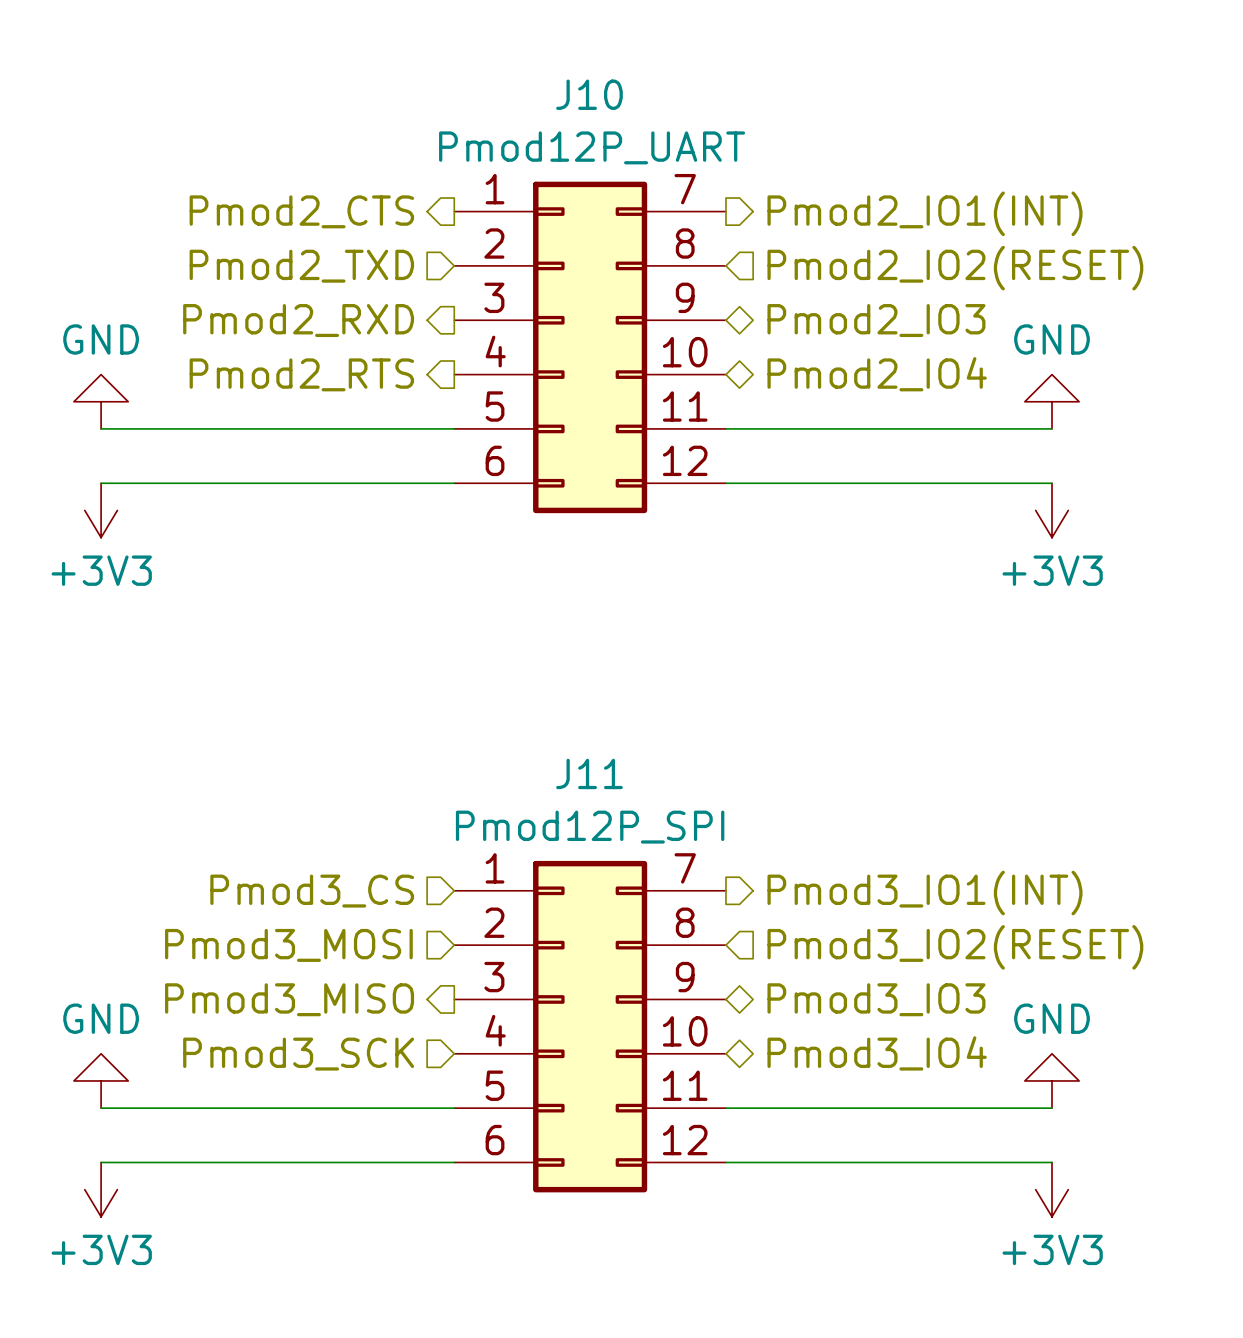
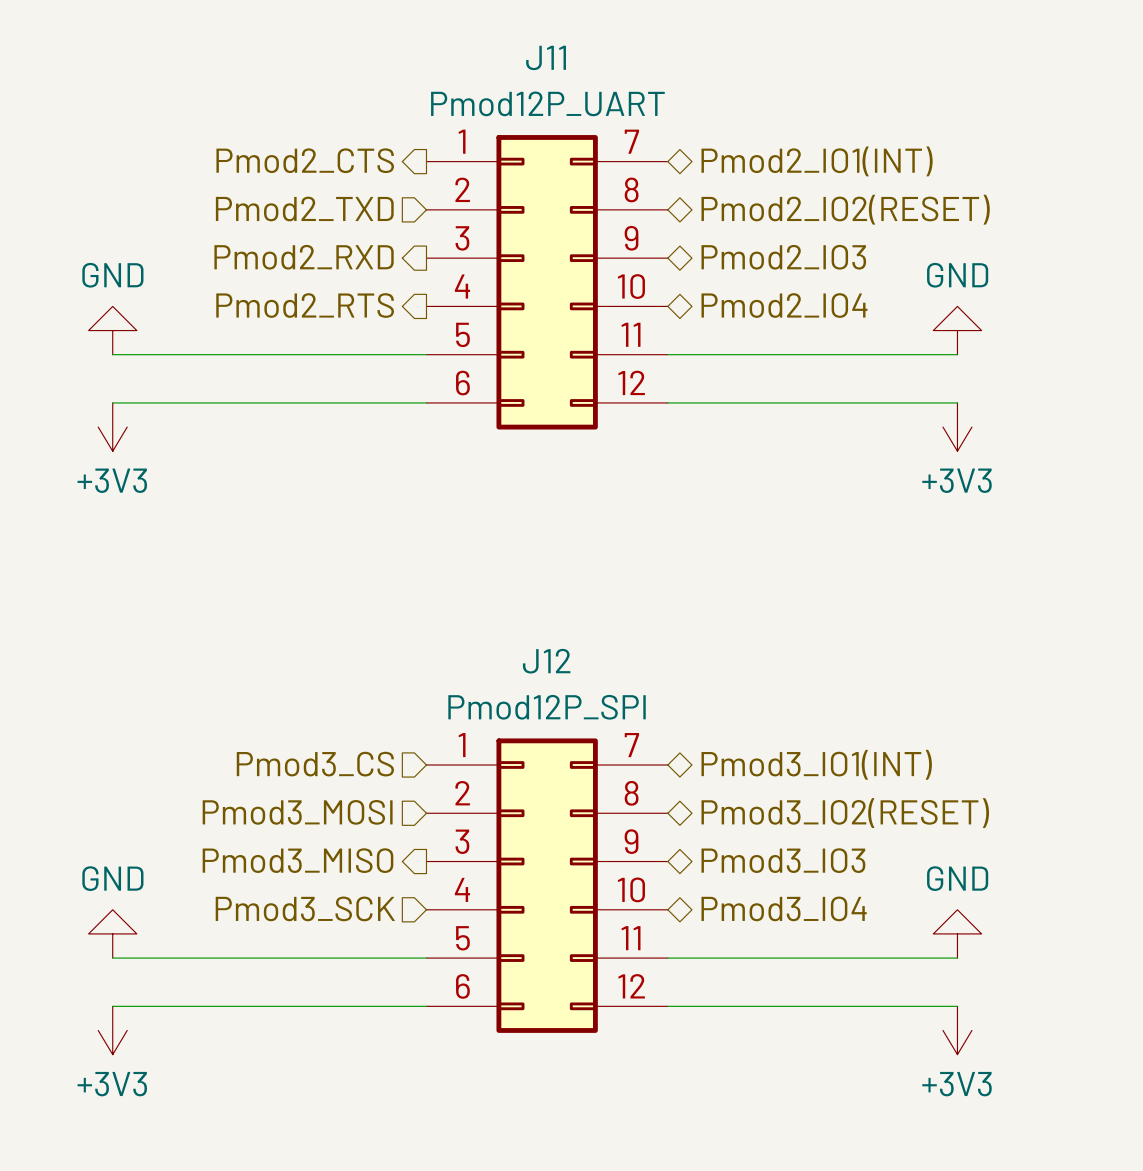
J10 name: J10 (589, 94) -> J11 (546, 57)
hierarchical label shape: output (924, 213) -> bidirectional (817, 161)
hierarchical label shape: input (955, 268) -> bidirectional (845, 209)
J11 name: J11 (589, 773) -> J12 (546, 661)
hierarchical label shape: output (924, 893) -> bidirectional (816, 764)
hierarchical label shape: input (955, 947) -> bidirectional (845, 813)

